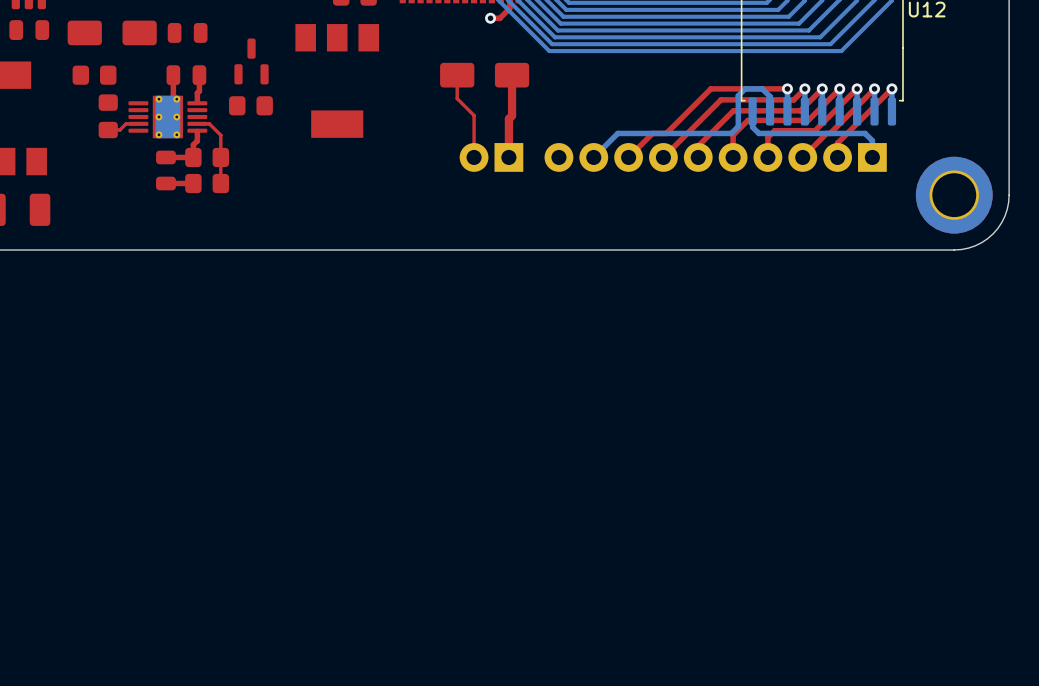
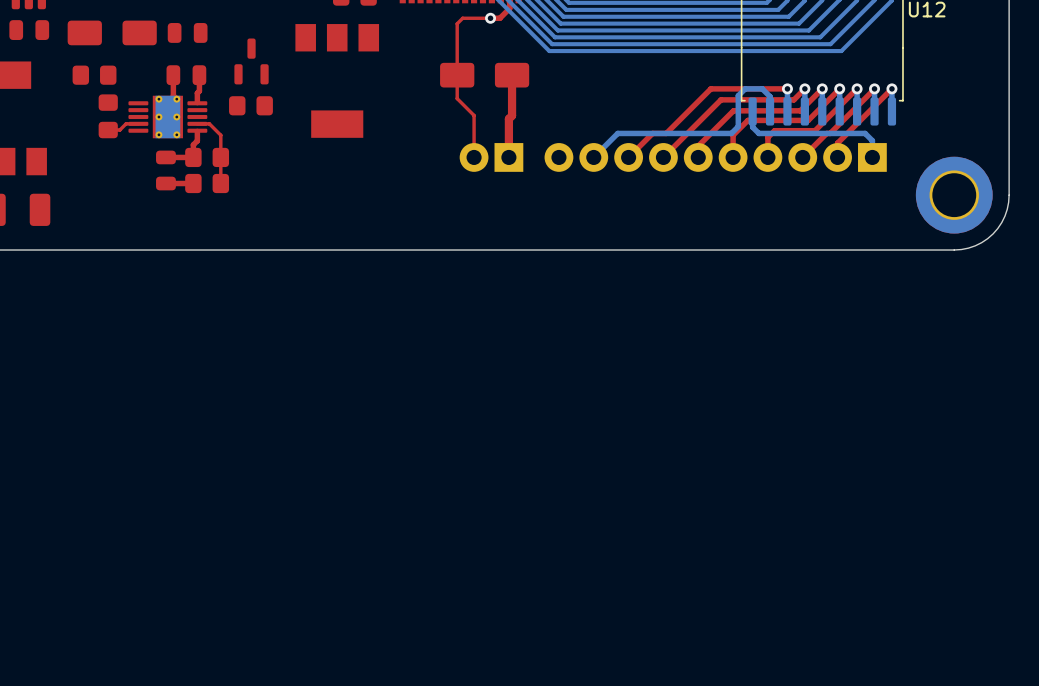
top track: none -> (490, 18) (462, 18) (457, 23) (457, 75)

